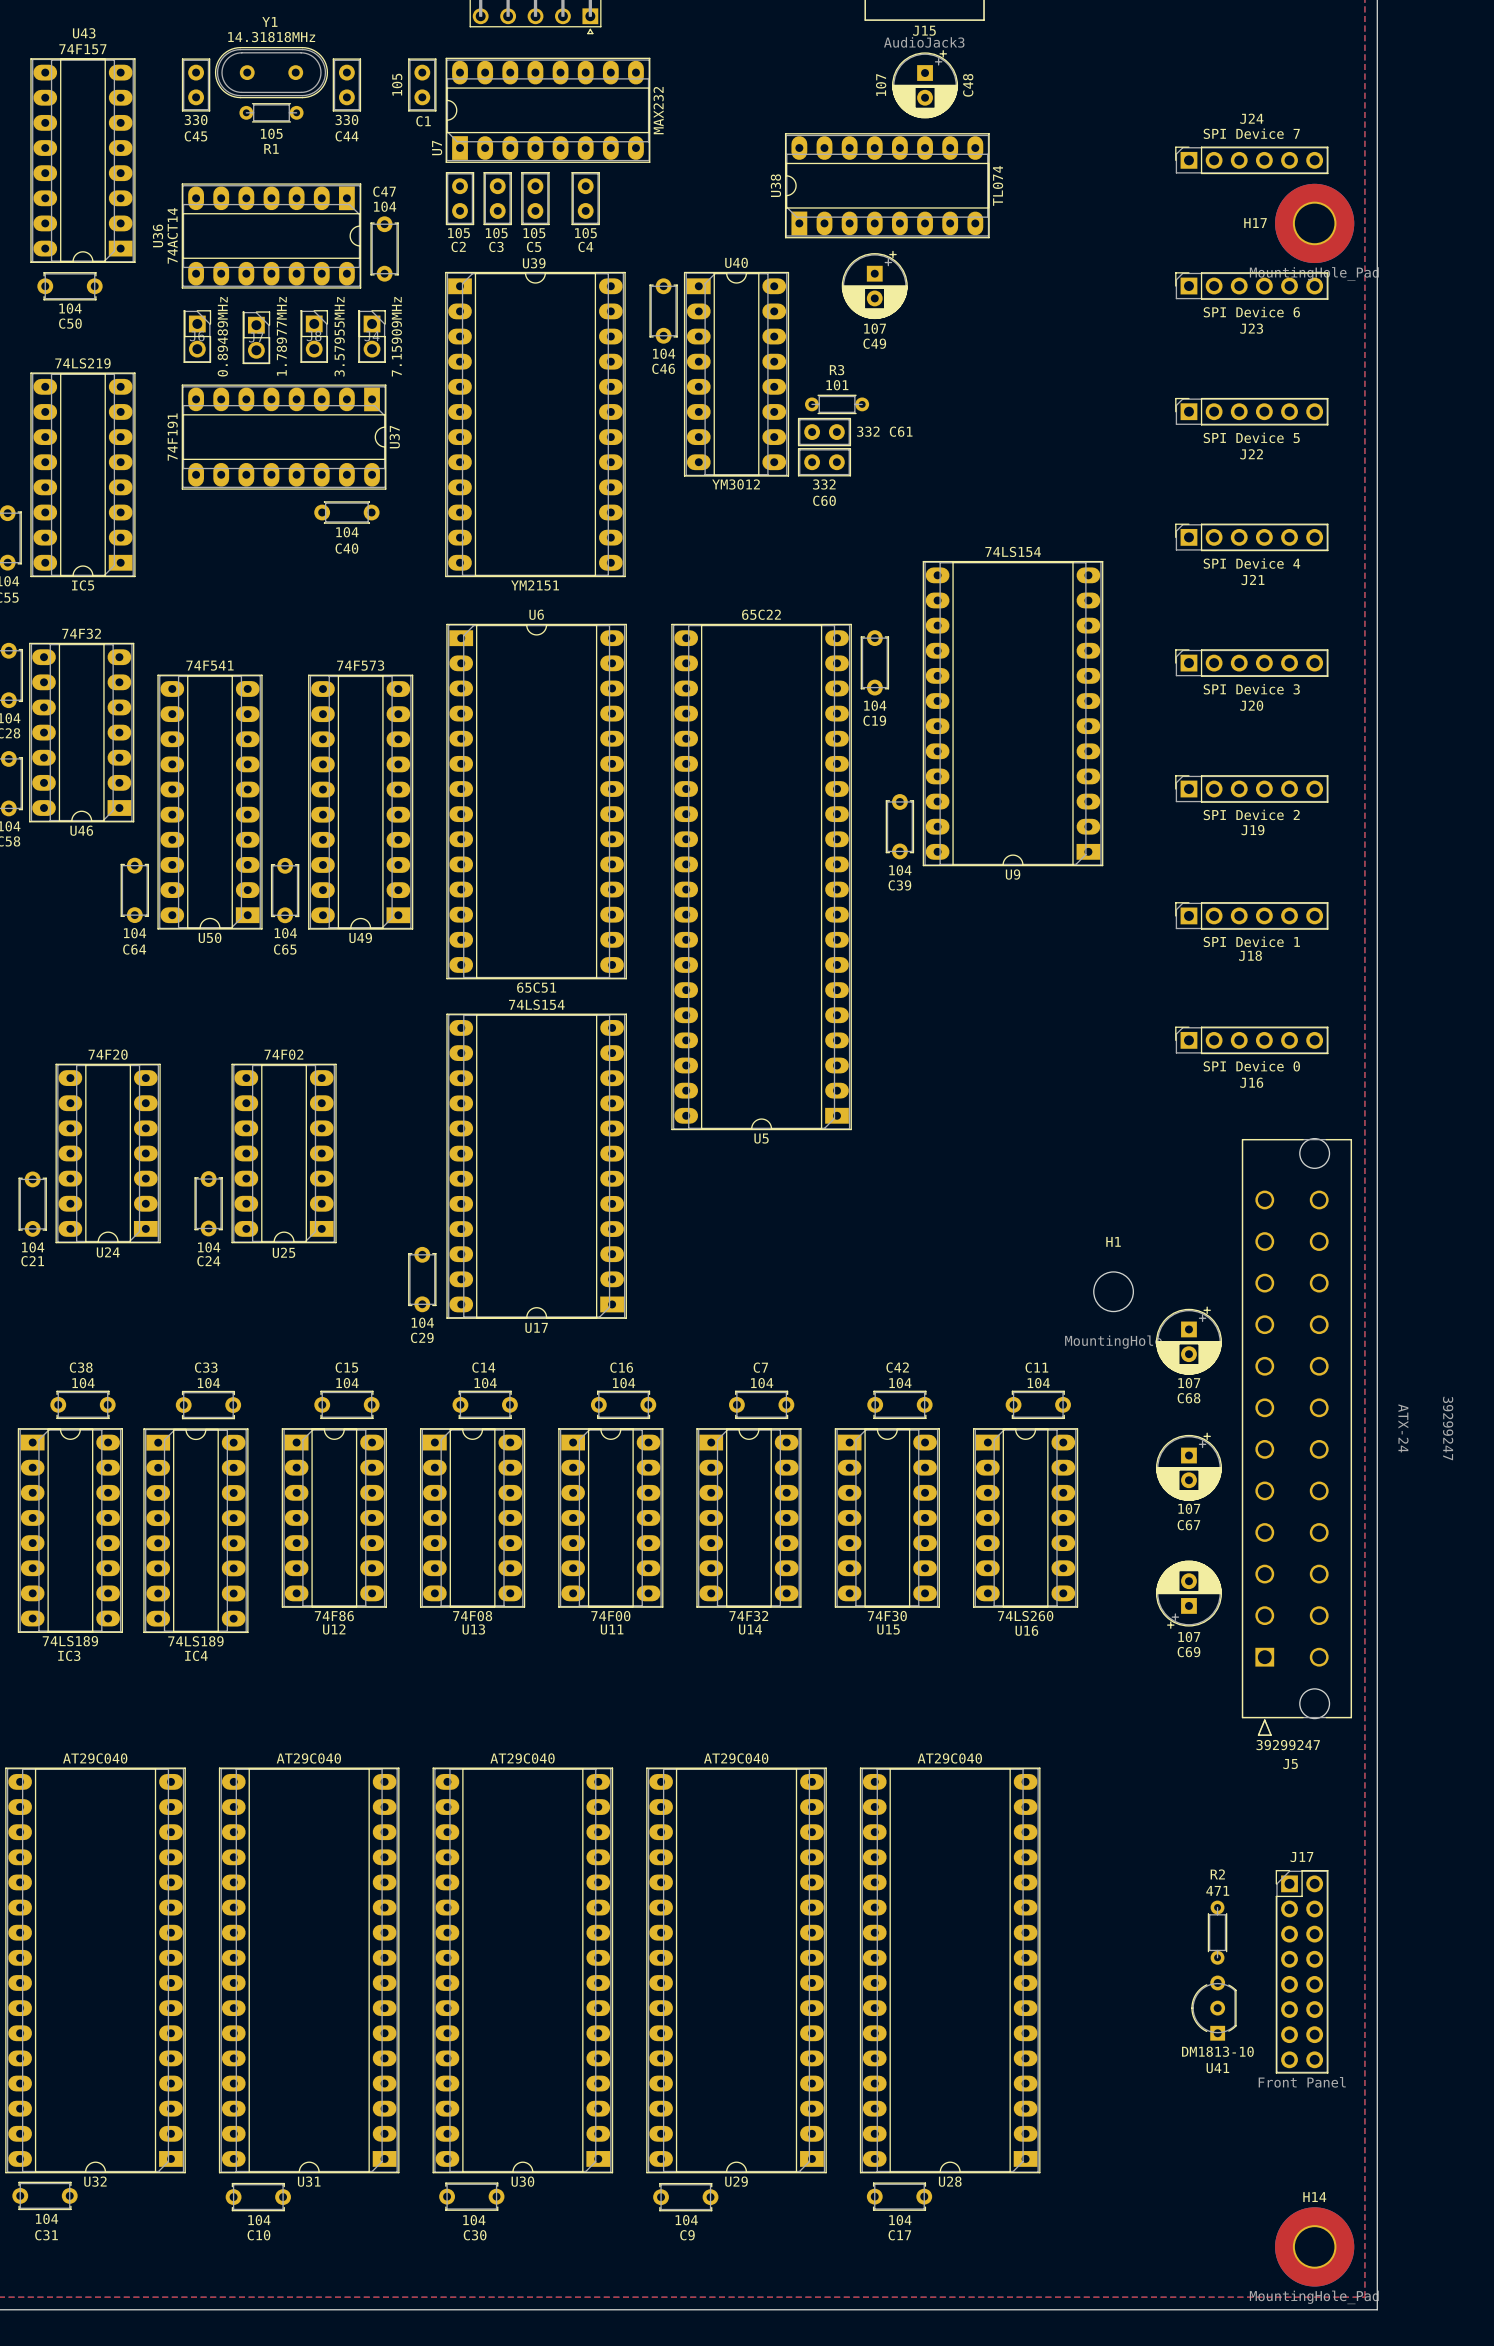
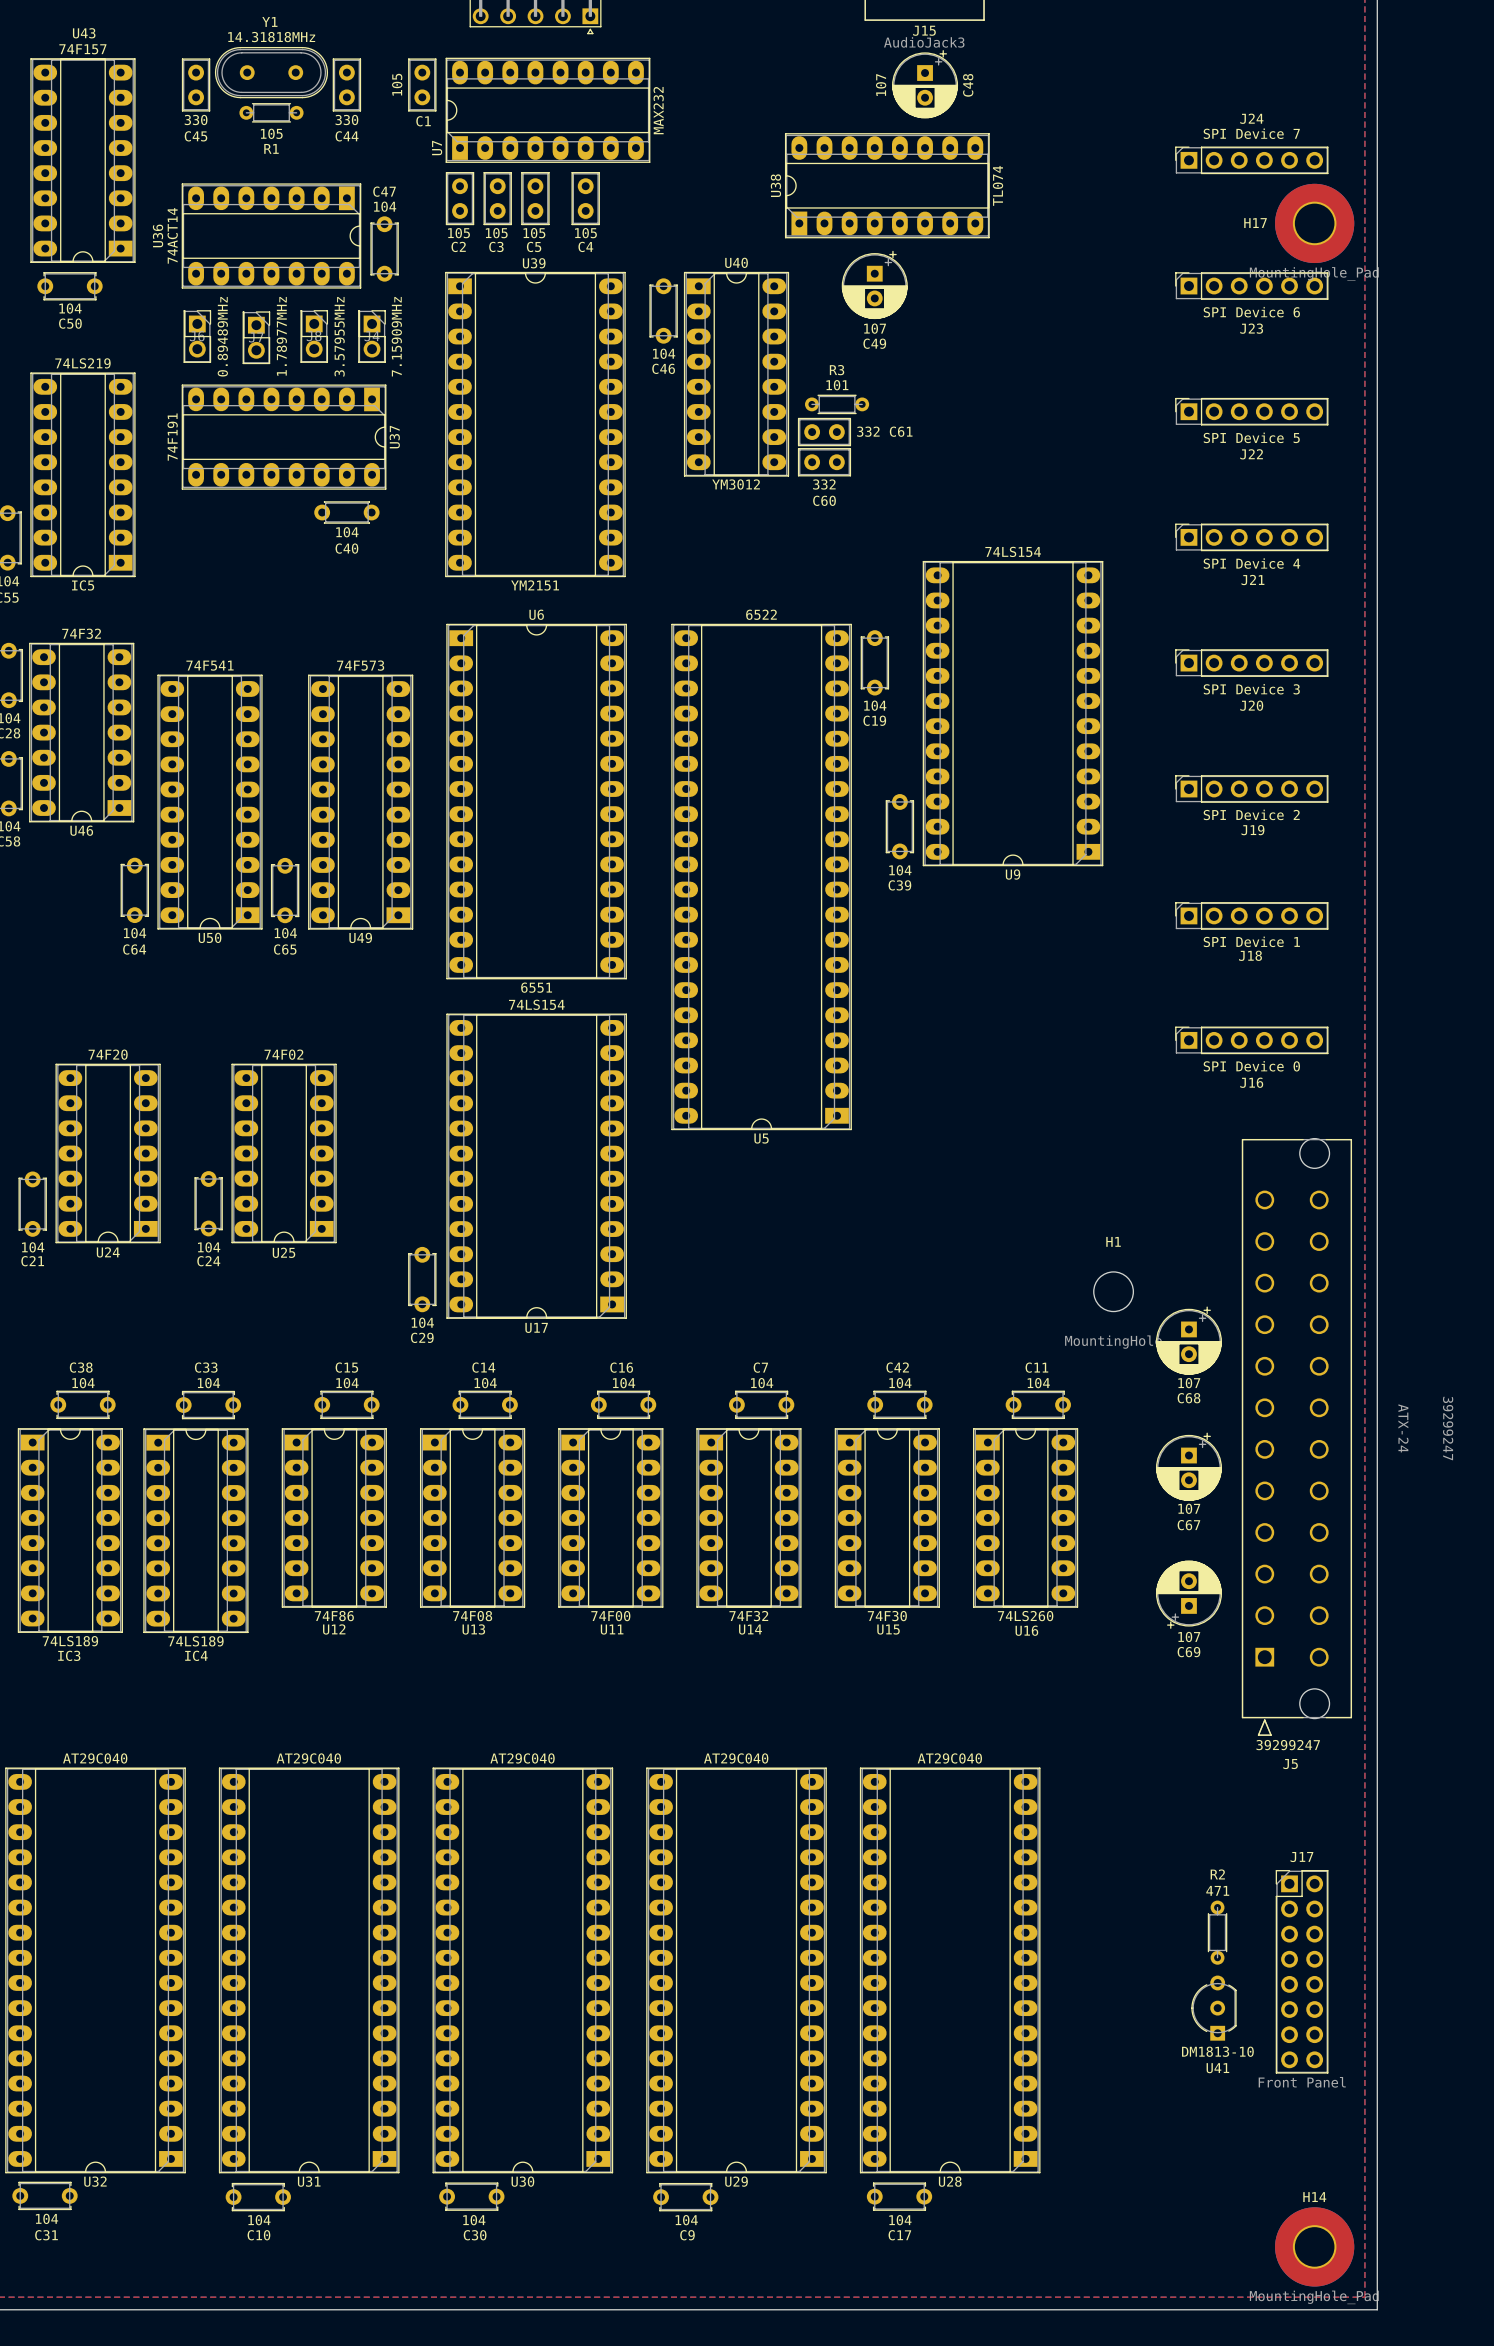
U5 value: 65C22 (761, 614) -> 6522 (761, 614)
U6 value: 65C51 (536, 987) -> 6551 (536, 987)

